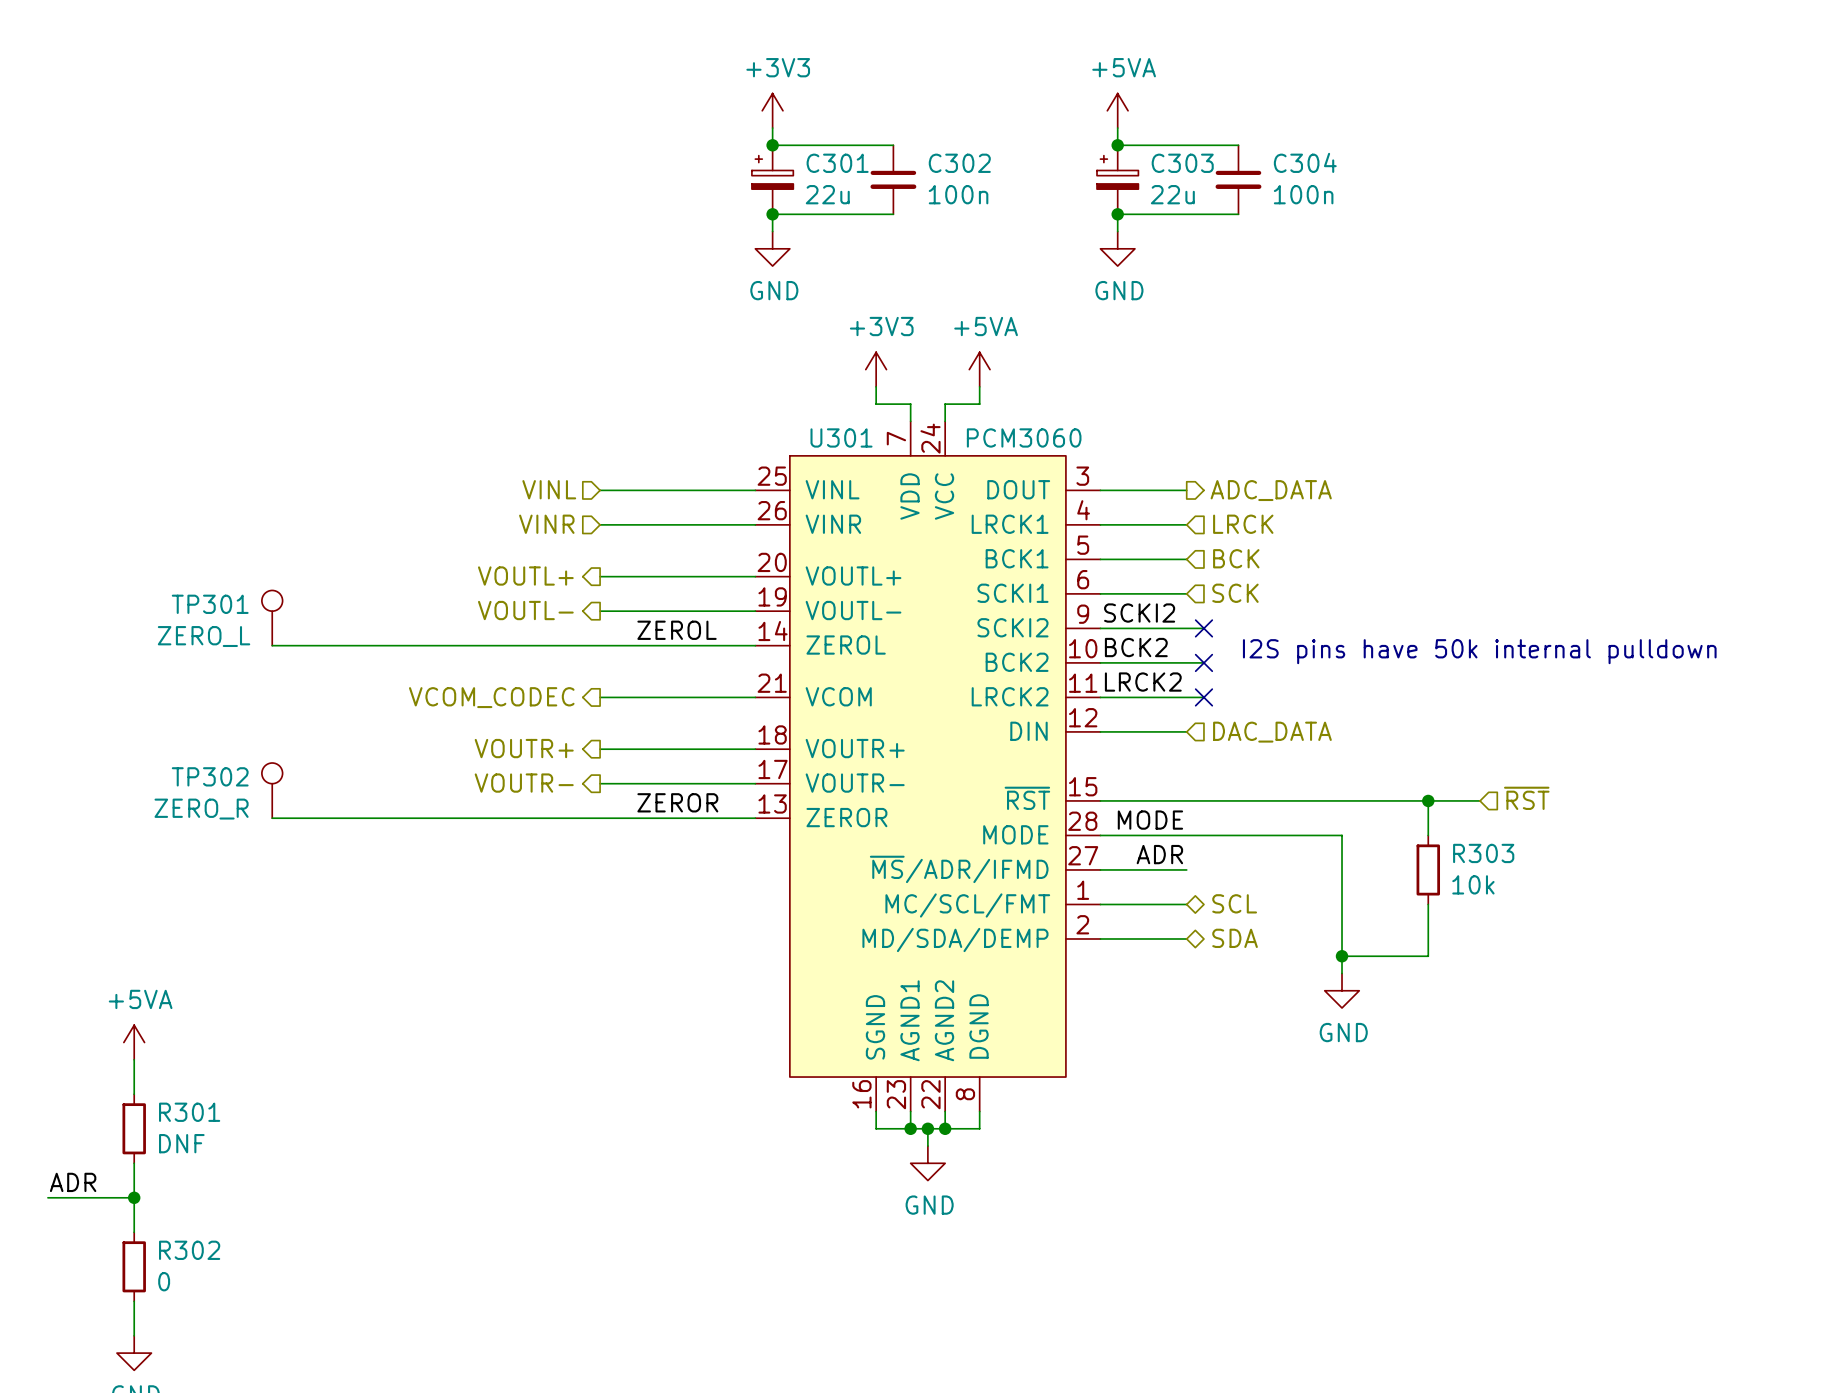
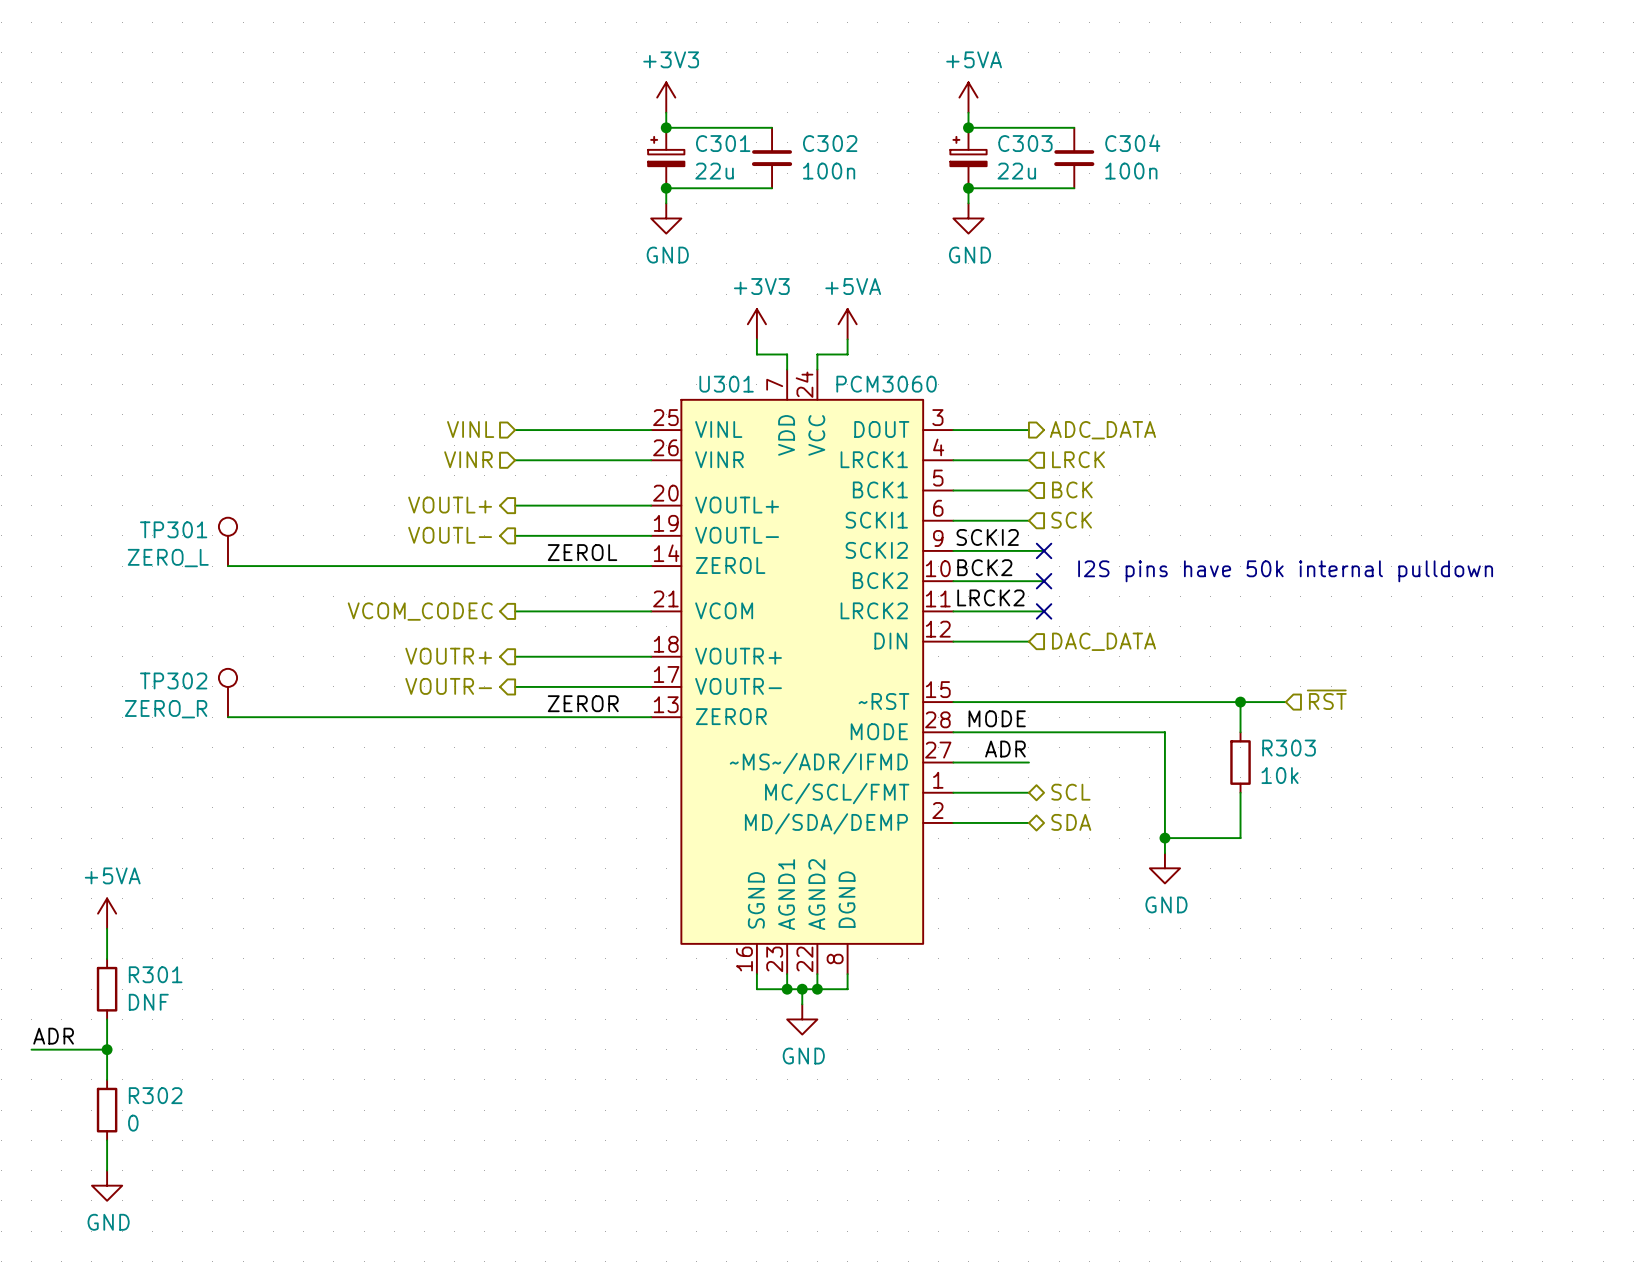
U301 pin name: ~{RST} (1027, 798) -> ~RST (883, 701)
U301 pin name: ~{MS}/ADR/IFMD (959, 869) -> ~MS~/ADR/IFMD (818, 763)

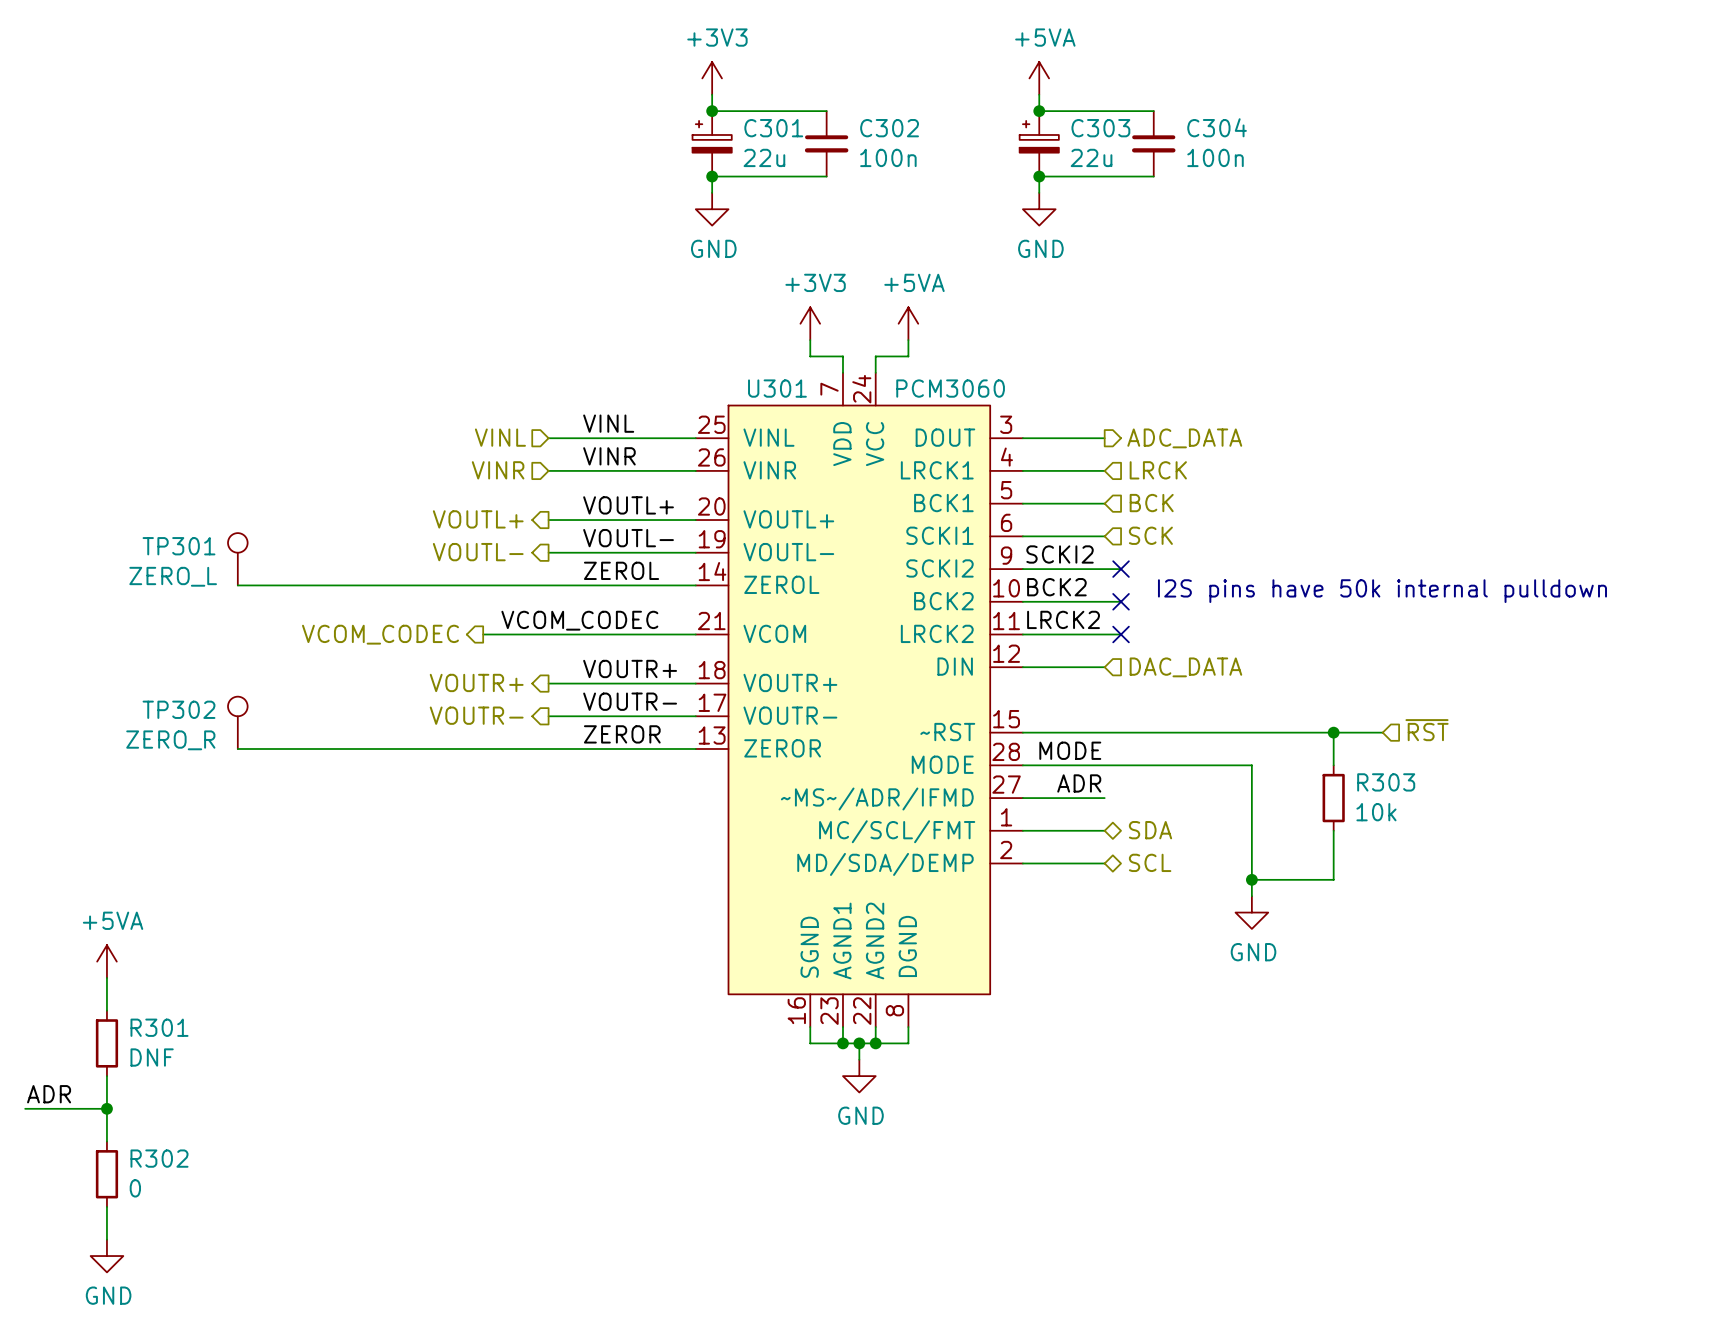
label: none -> VINL (608, 423)
label: none -> VINR (609, 456)
label: none -> VOUTL+ (628, 505)
label: none -> VOUTL- (628, 538)
label: none -> VCOM_CODEC (579, 620)
hierarchical label position: VCOM_CODEC (420, 611) -> VCOM_CODEC (380, 634)
wire: none -> (483, 634) (548, 634)
label: none -> VOUTR+ (630, 668)
label: none -> VOUTR- (630, 701)
hierarchical label: SCL (1070, 792) -> SDA (1150, 830)
hierarchical label: SDA (1071, 822) -> SCL (1150, 862)

